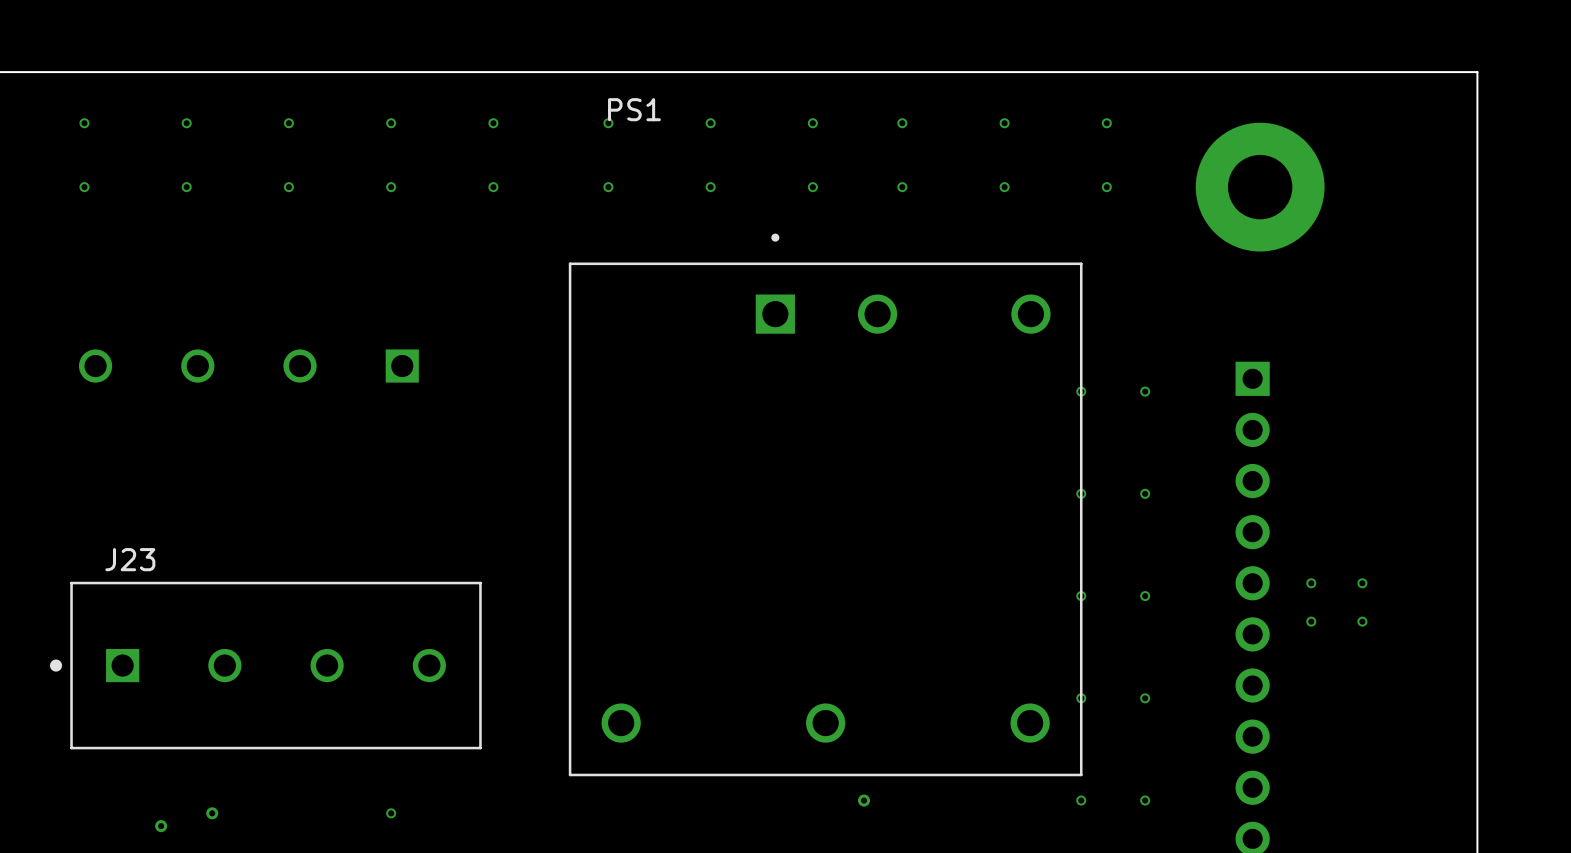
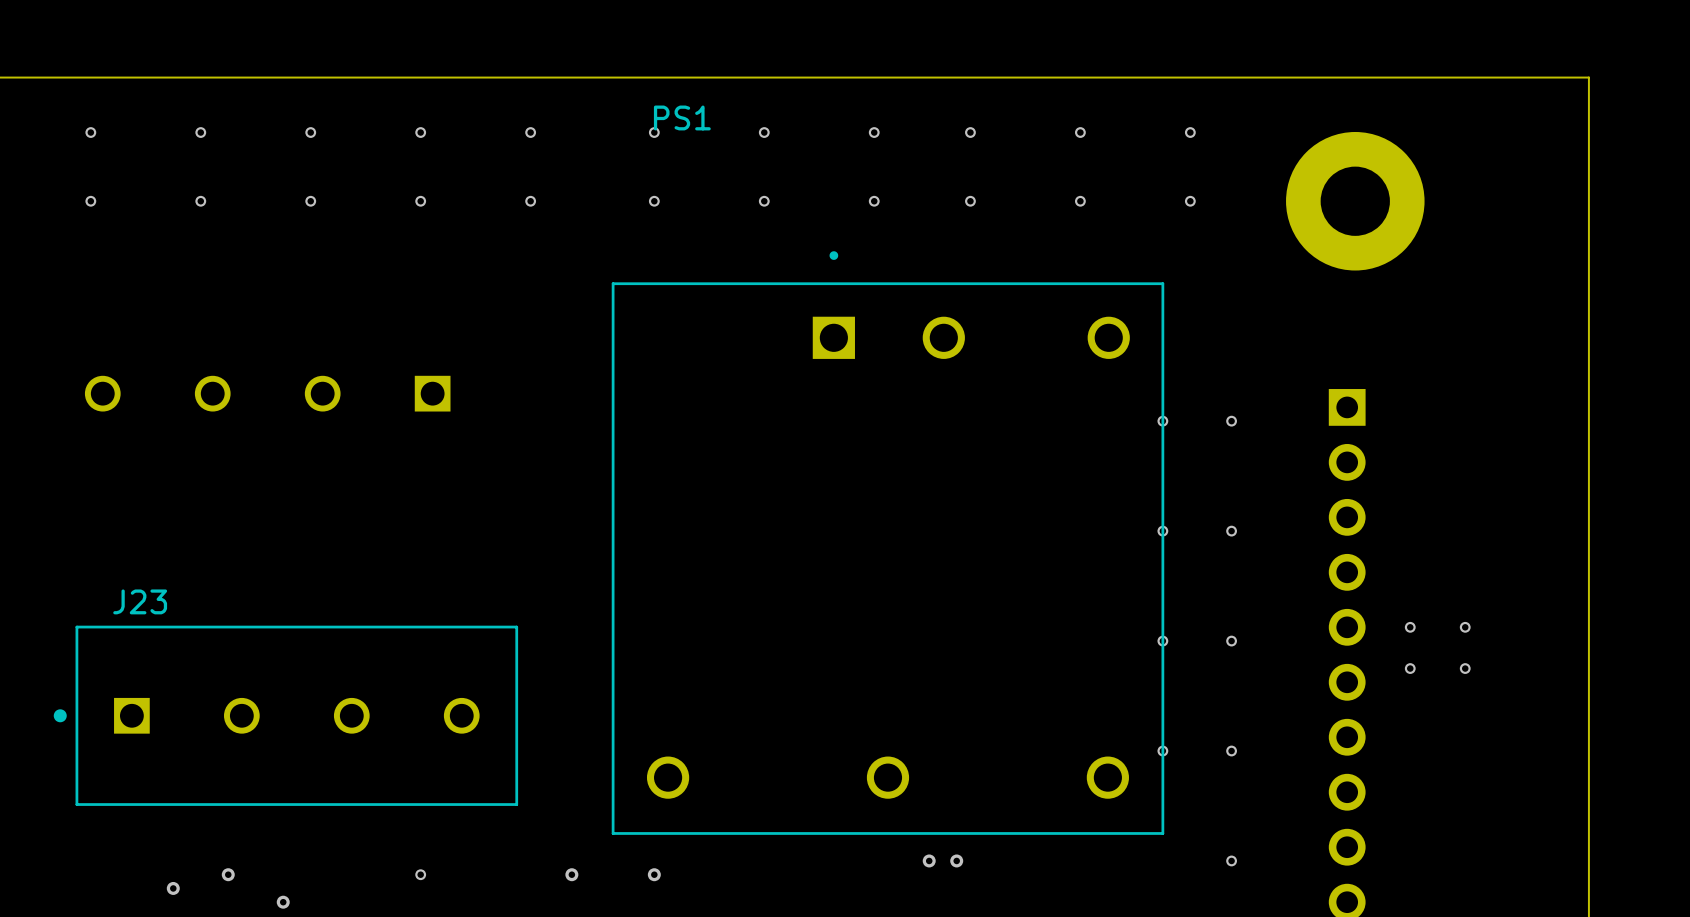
via: none -> (956, 860)
via: (1081, 800) -> none
via: none -> (571, 874)
via: none -> (654, 874)
via: none -> (283, 902)

